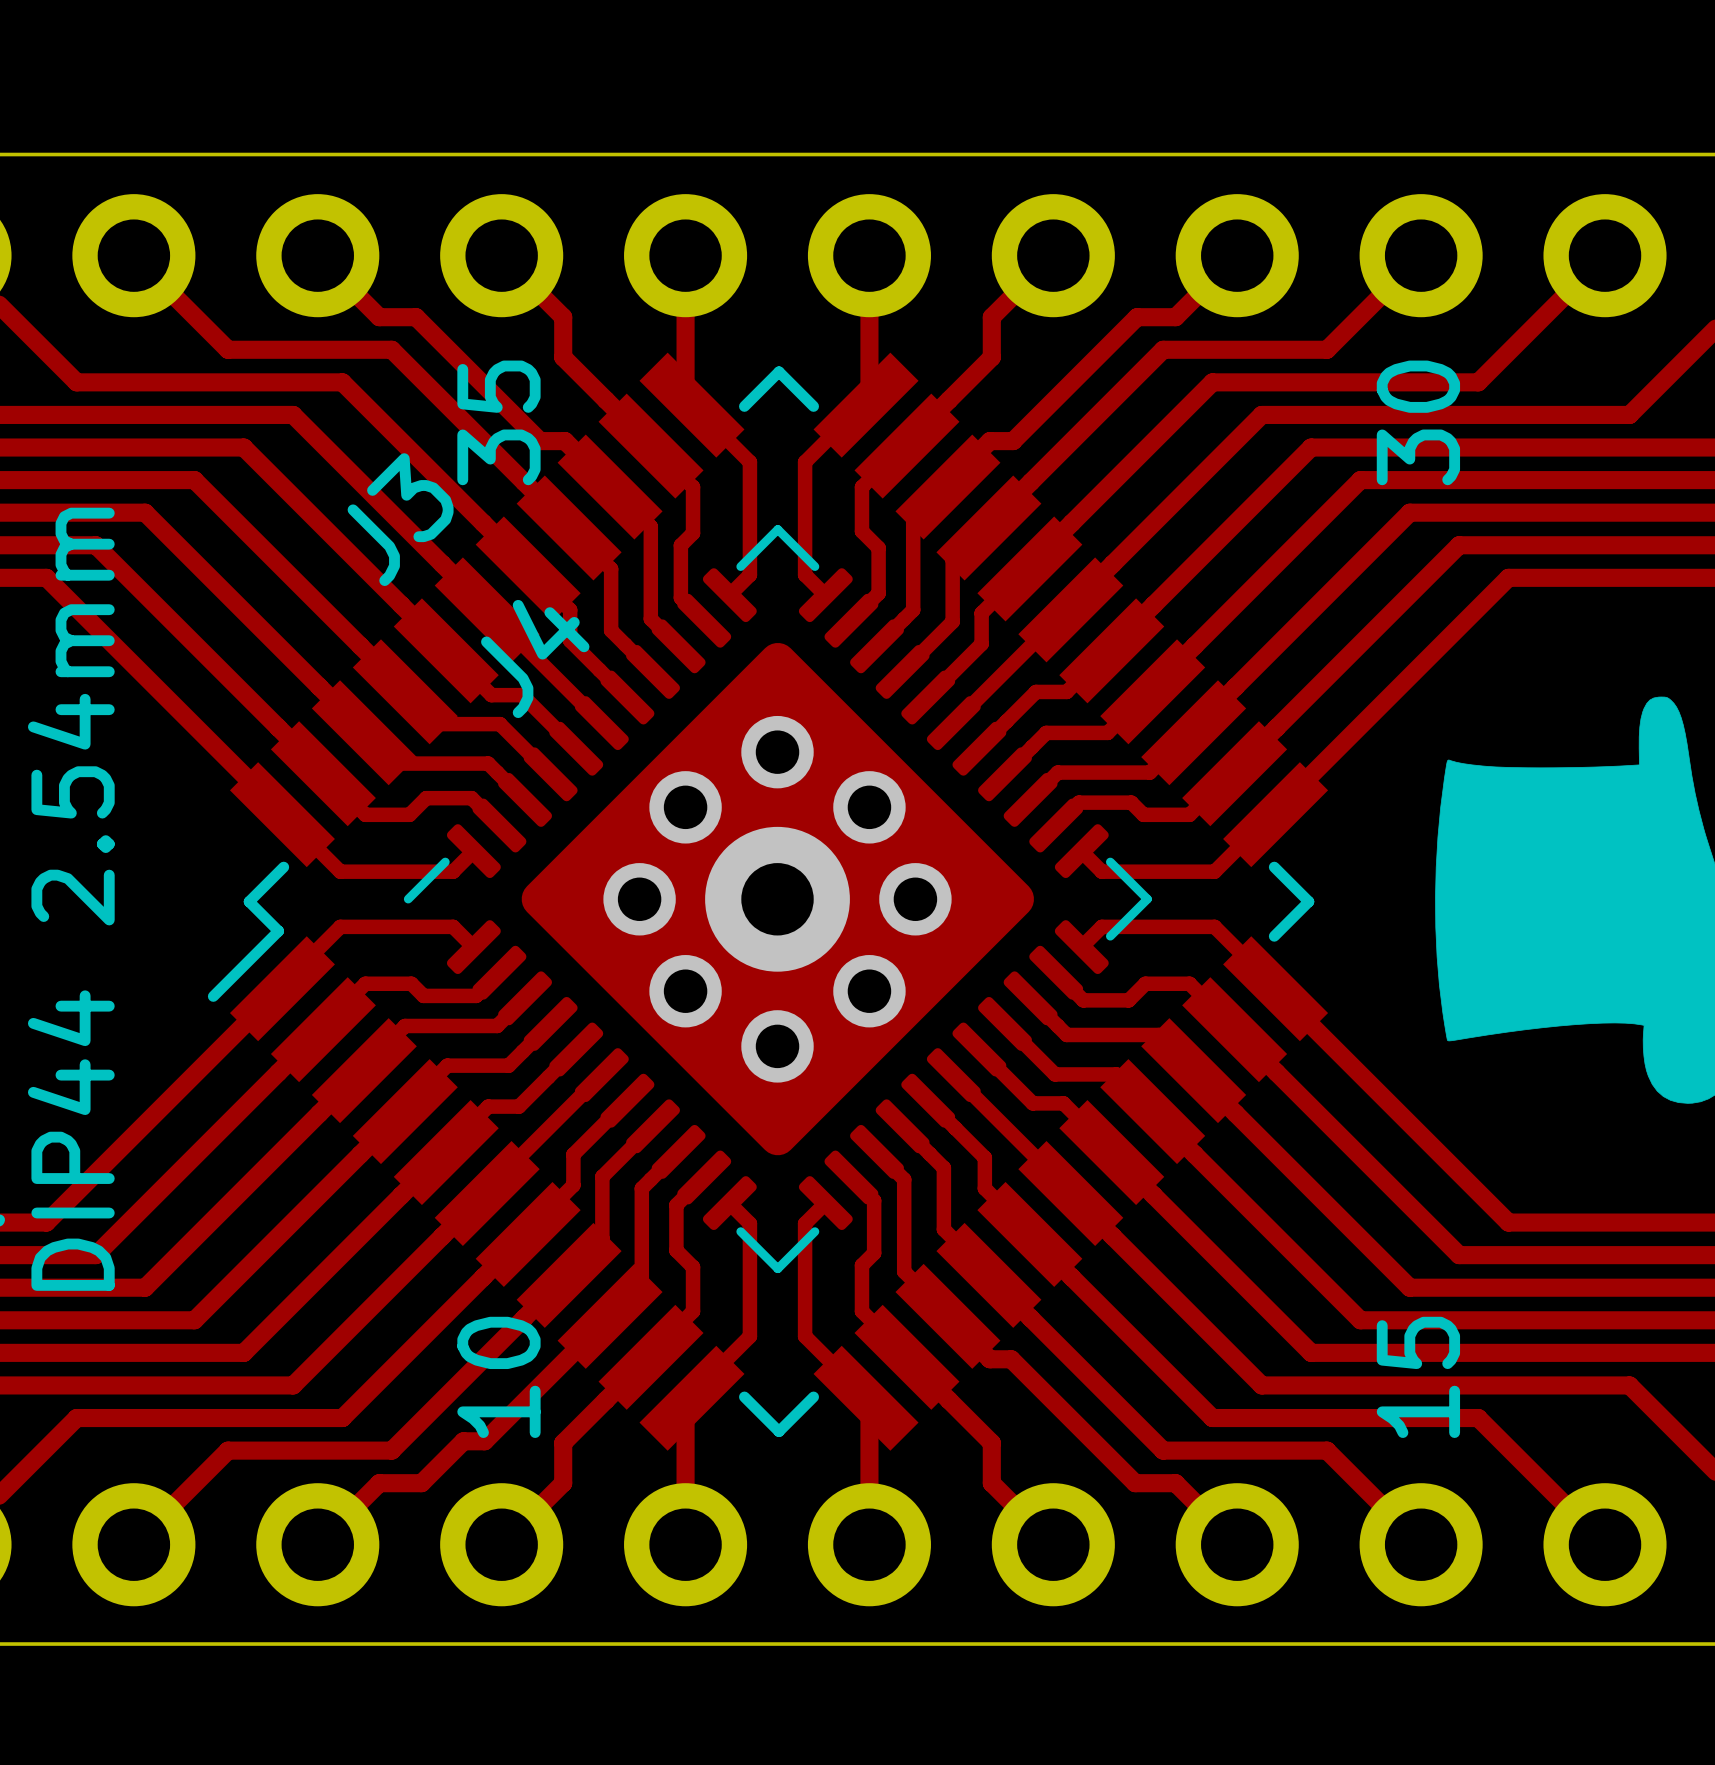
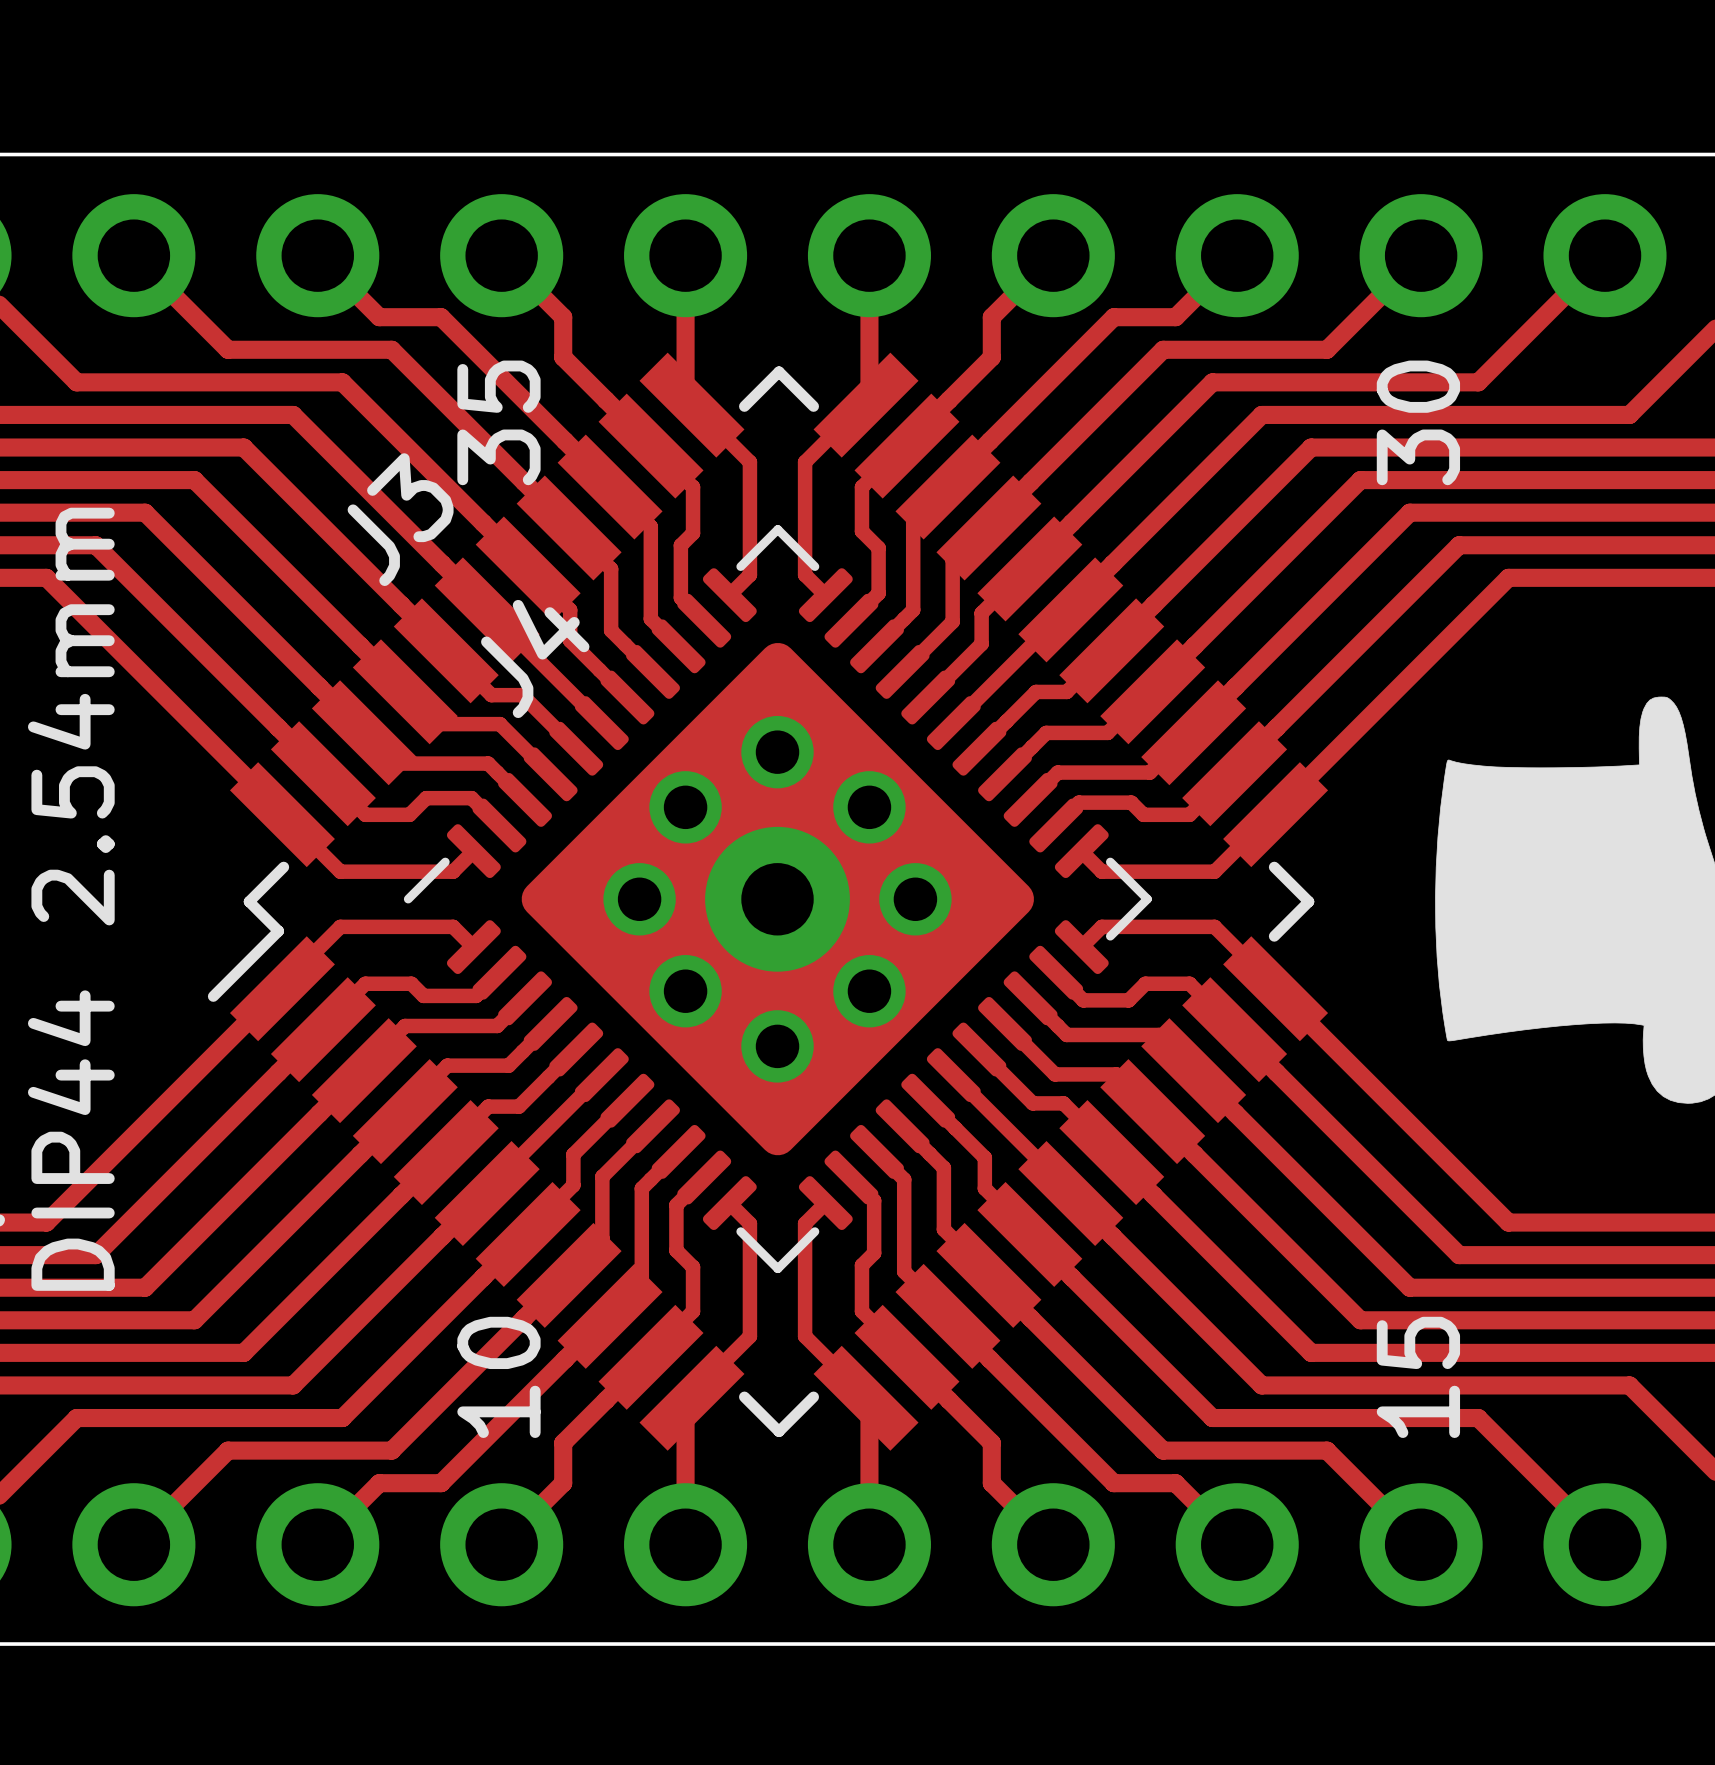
track: (416, 317) (540, 441) (565, 441) -> (416, 317) (441, 317) (565, 441)
track: (1137, 317) (1013, 441) (989, 441) -> (1137, 317) (1113, 317) (989, 441)
track: (608, 1313) (608, 1317) (484, 1441) (463, 1441) (421, 1483) -> (608, 1315) (441, 1483) (421, 1483)
track: (989, 1359) (1011, 1359) (1135, 1483) -> (989, 1359) (1113, 1483) (1135, 1483)

